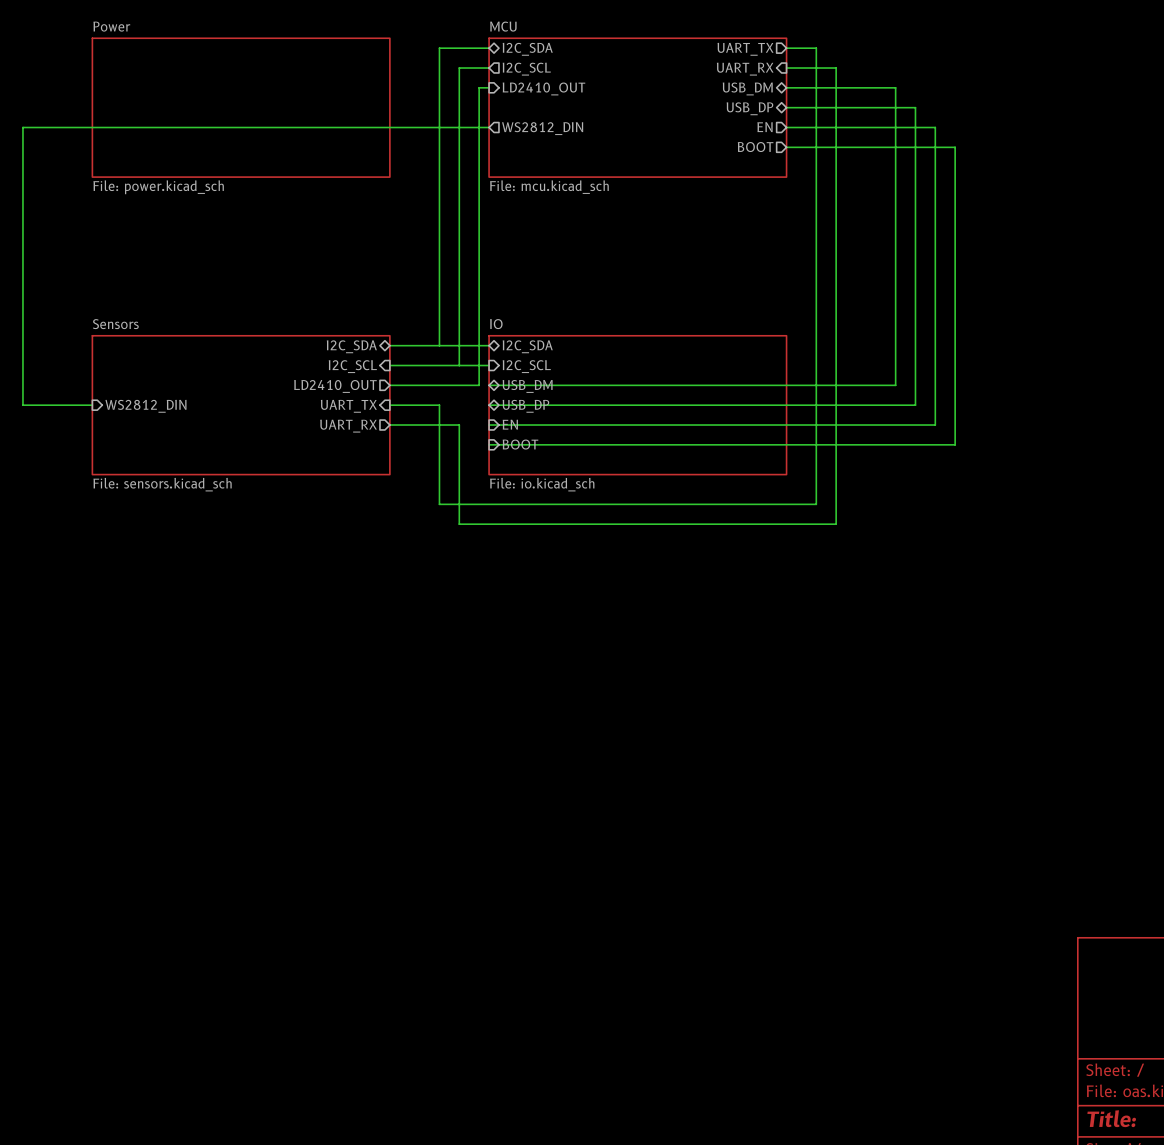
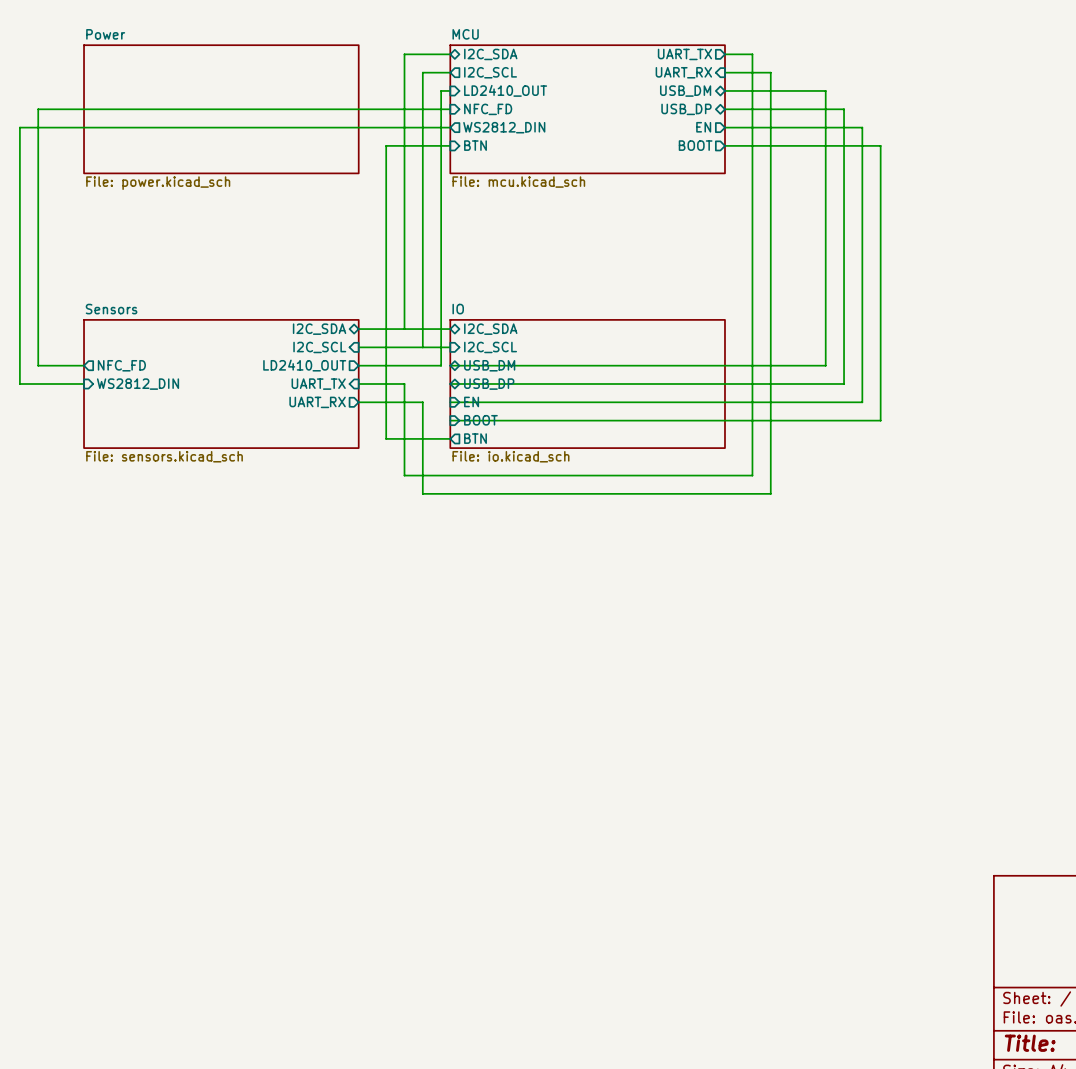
wire: none -> (450, 109) (38, 109) (38, 365) (84, 365)
sheet pin: none -> NFC_FD (488, 109)
sheet pin: none -> BTN (475, 145)
wire: none -> (450, 145) (386, 145) (386, 438) (450, 438)
sheet pin: none -> NFC_FD (121, 365)
sheet pin: none -> BTN (475, 438)

